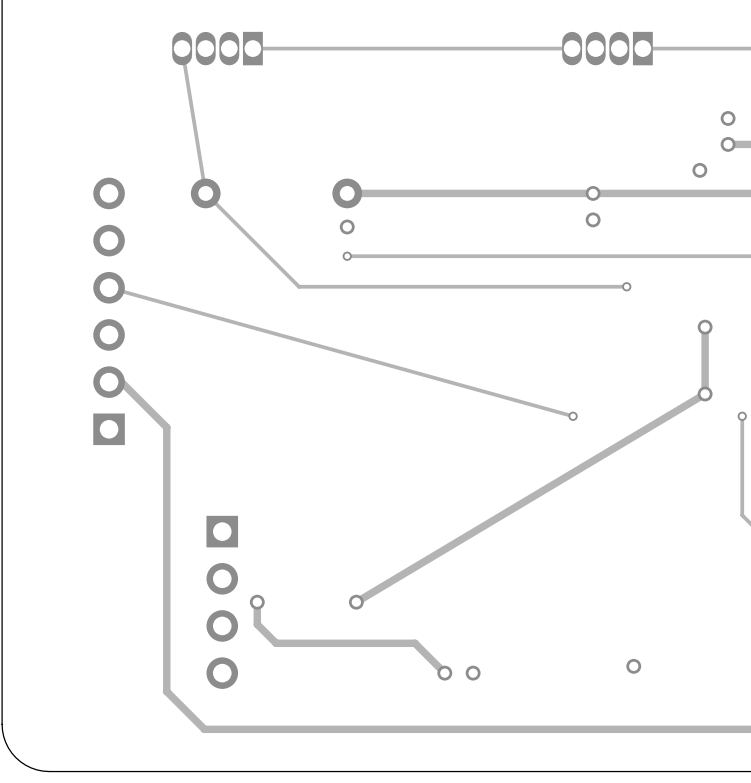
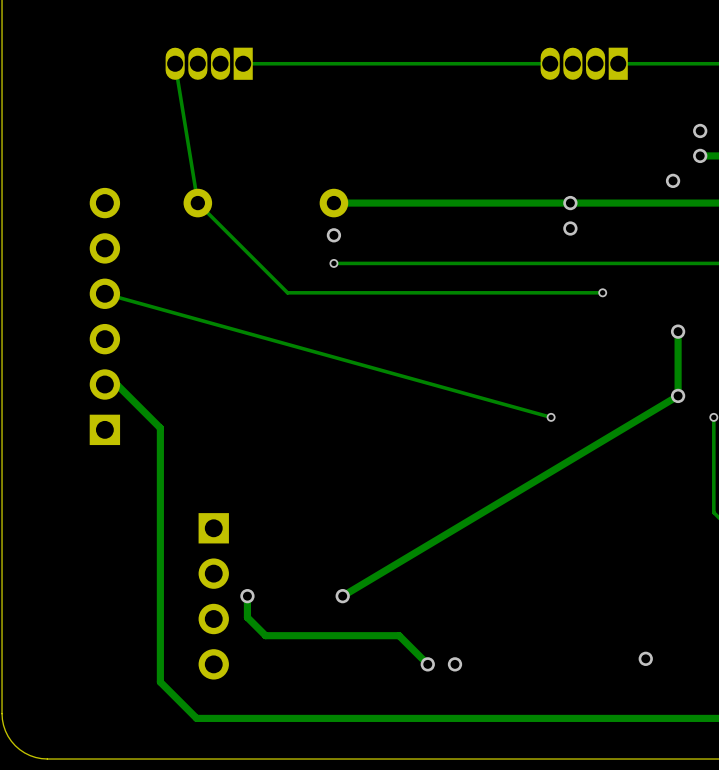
via position: (633, 666) -> (645, 658)

